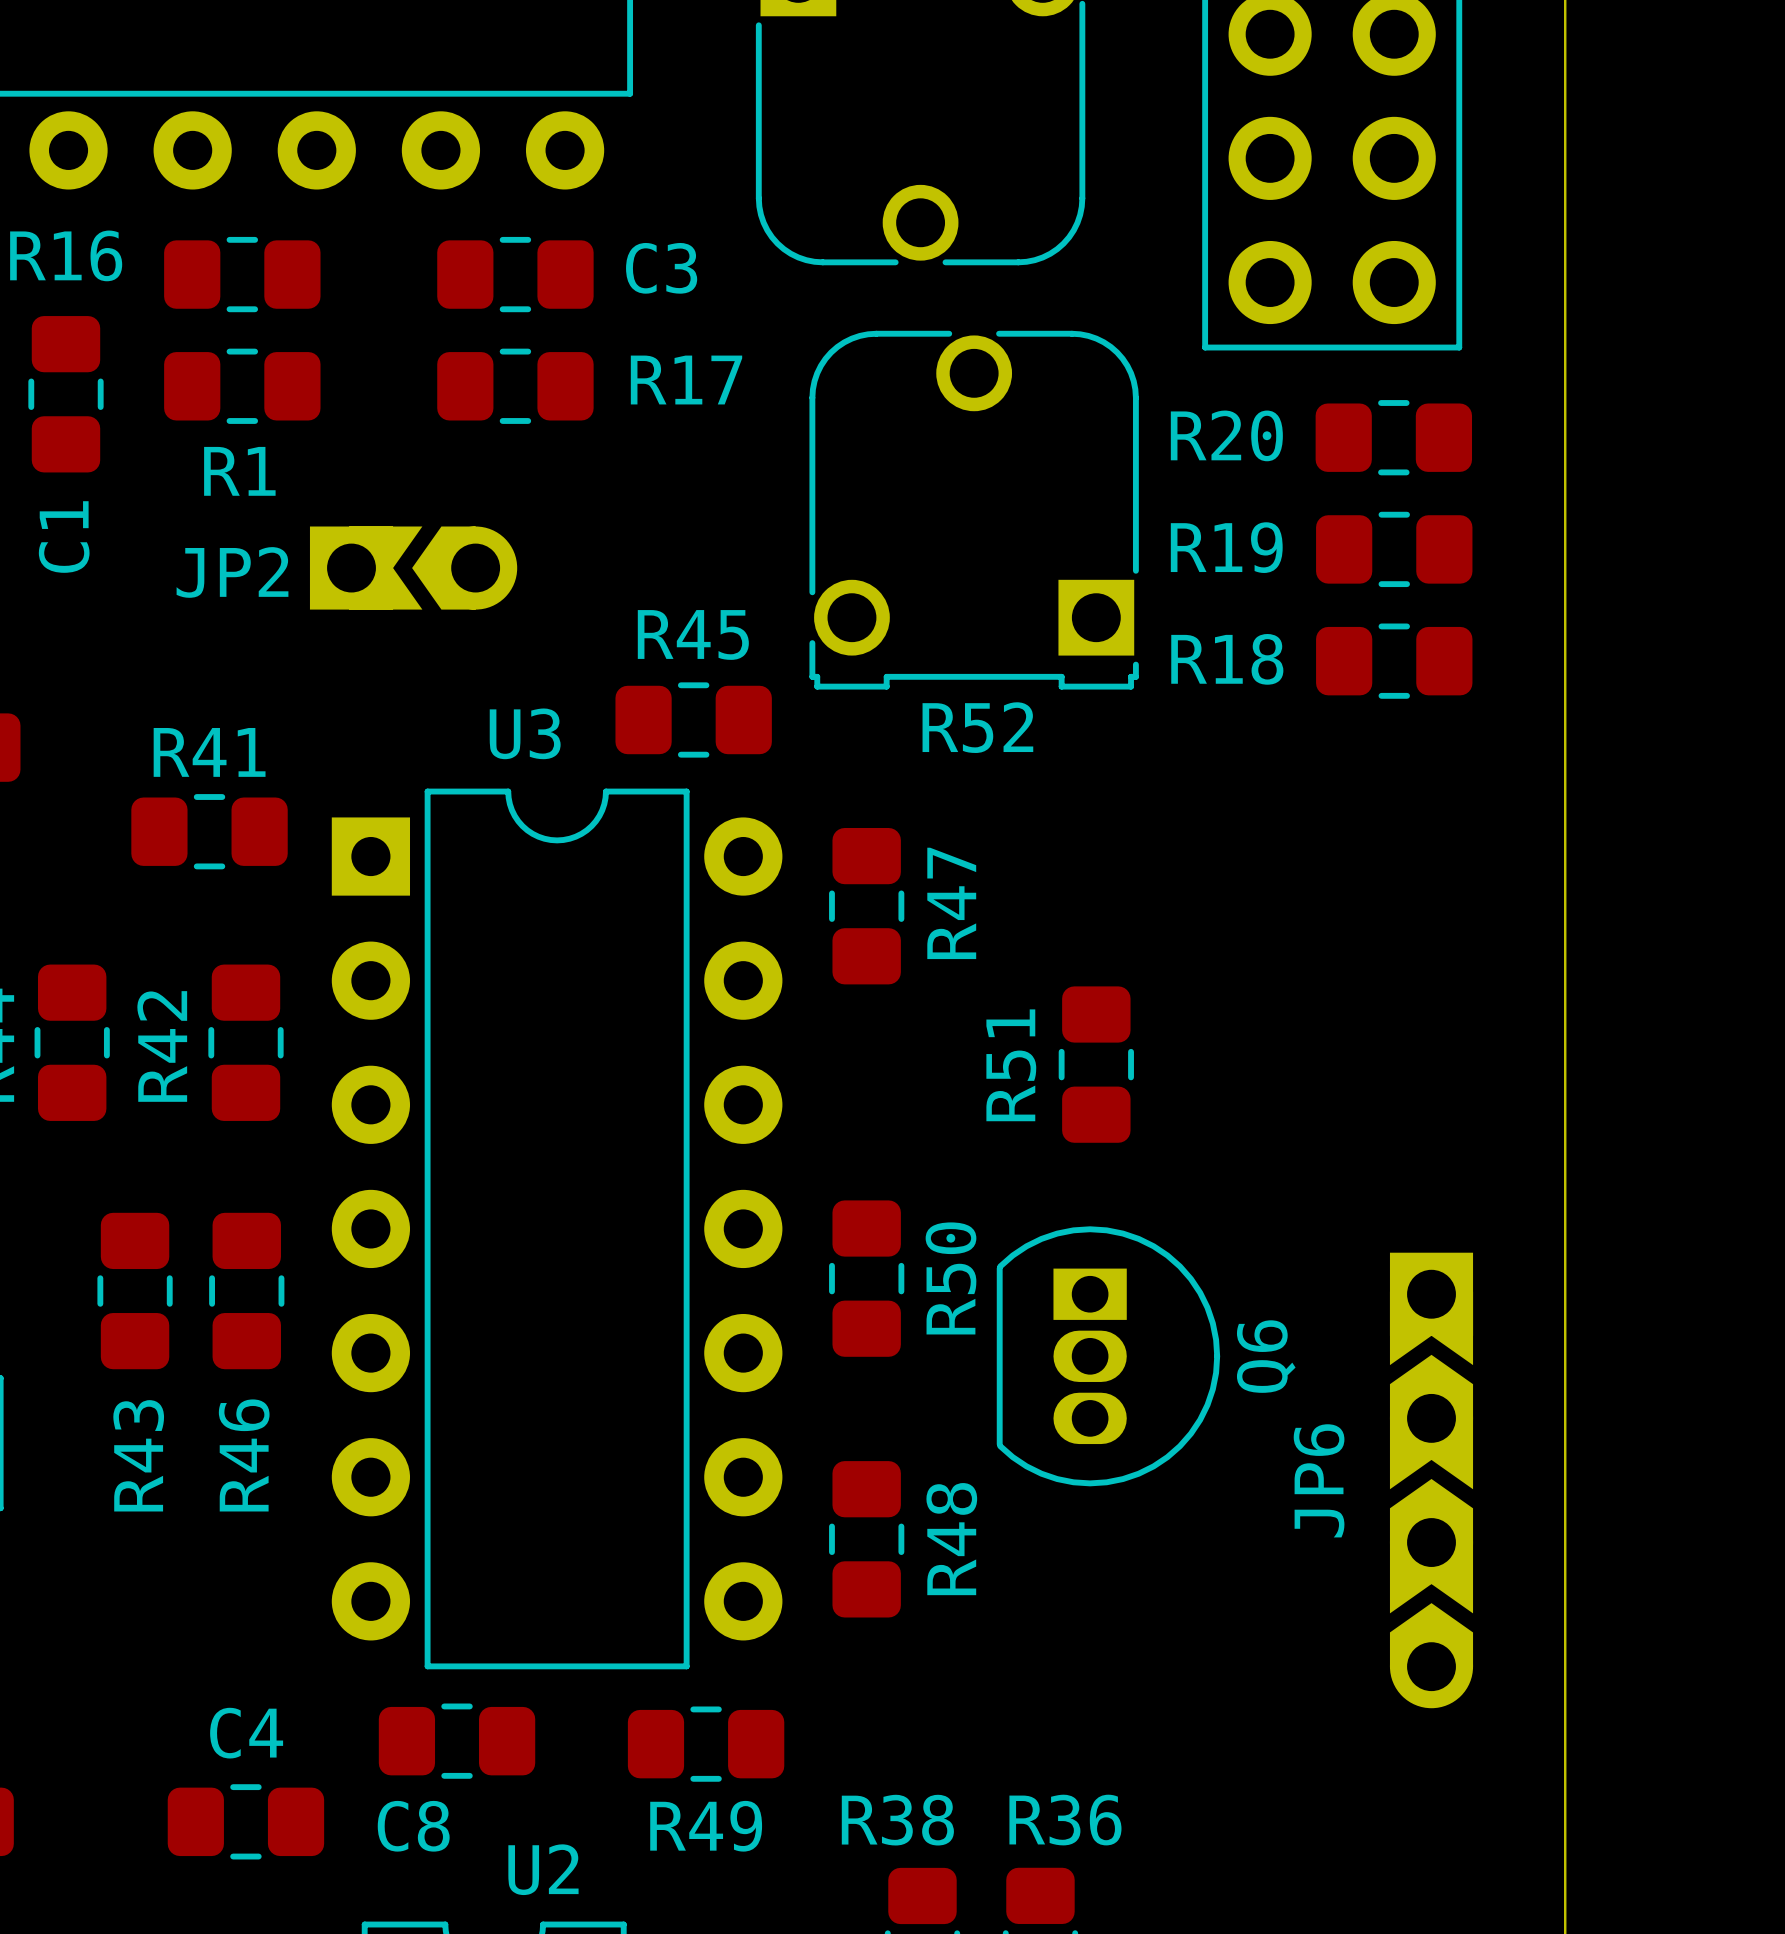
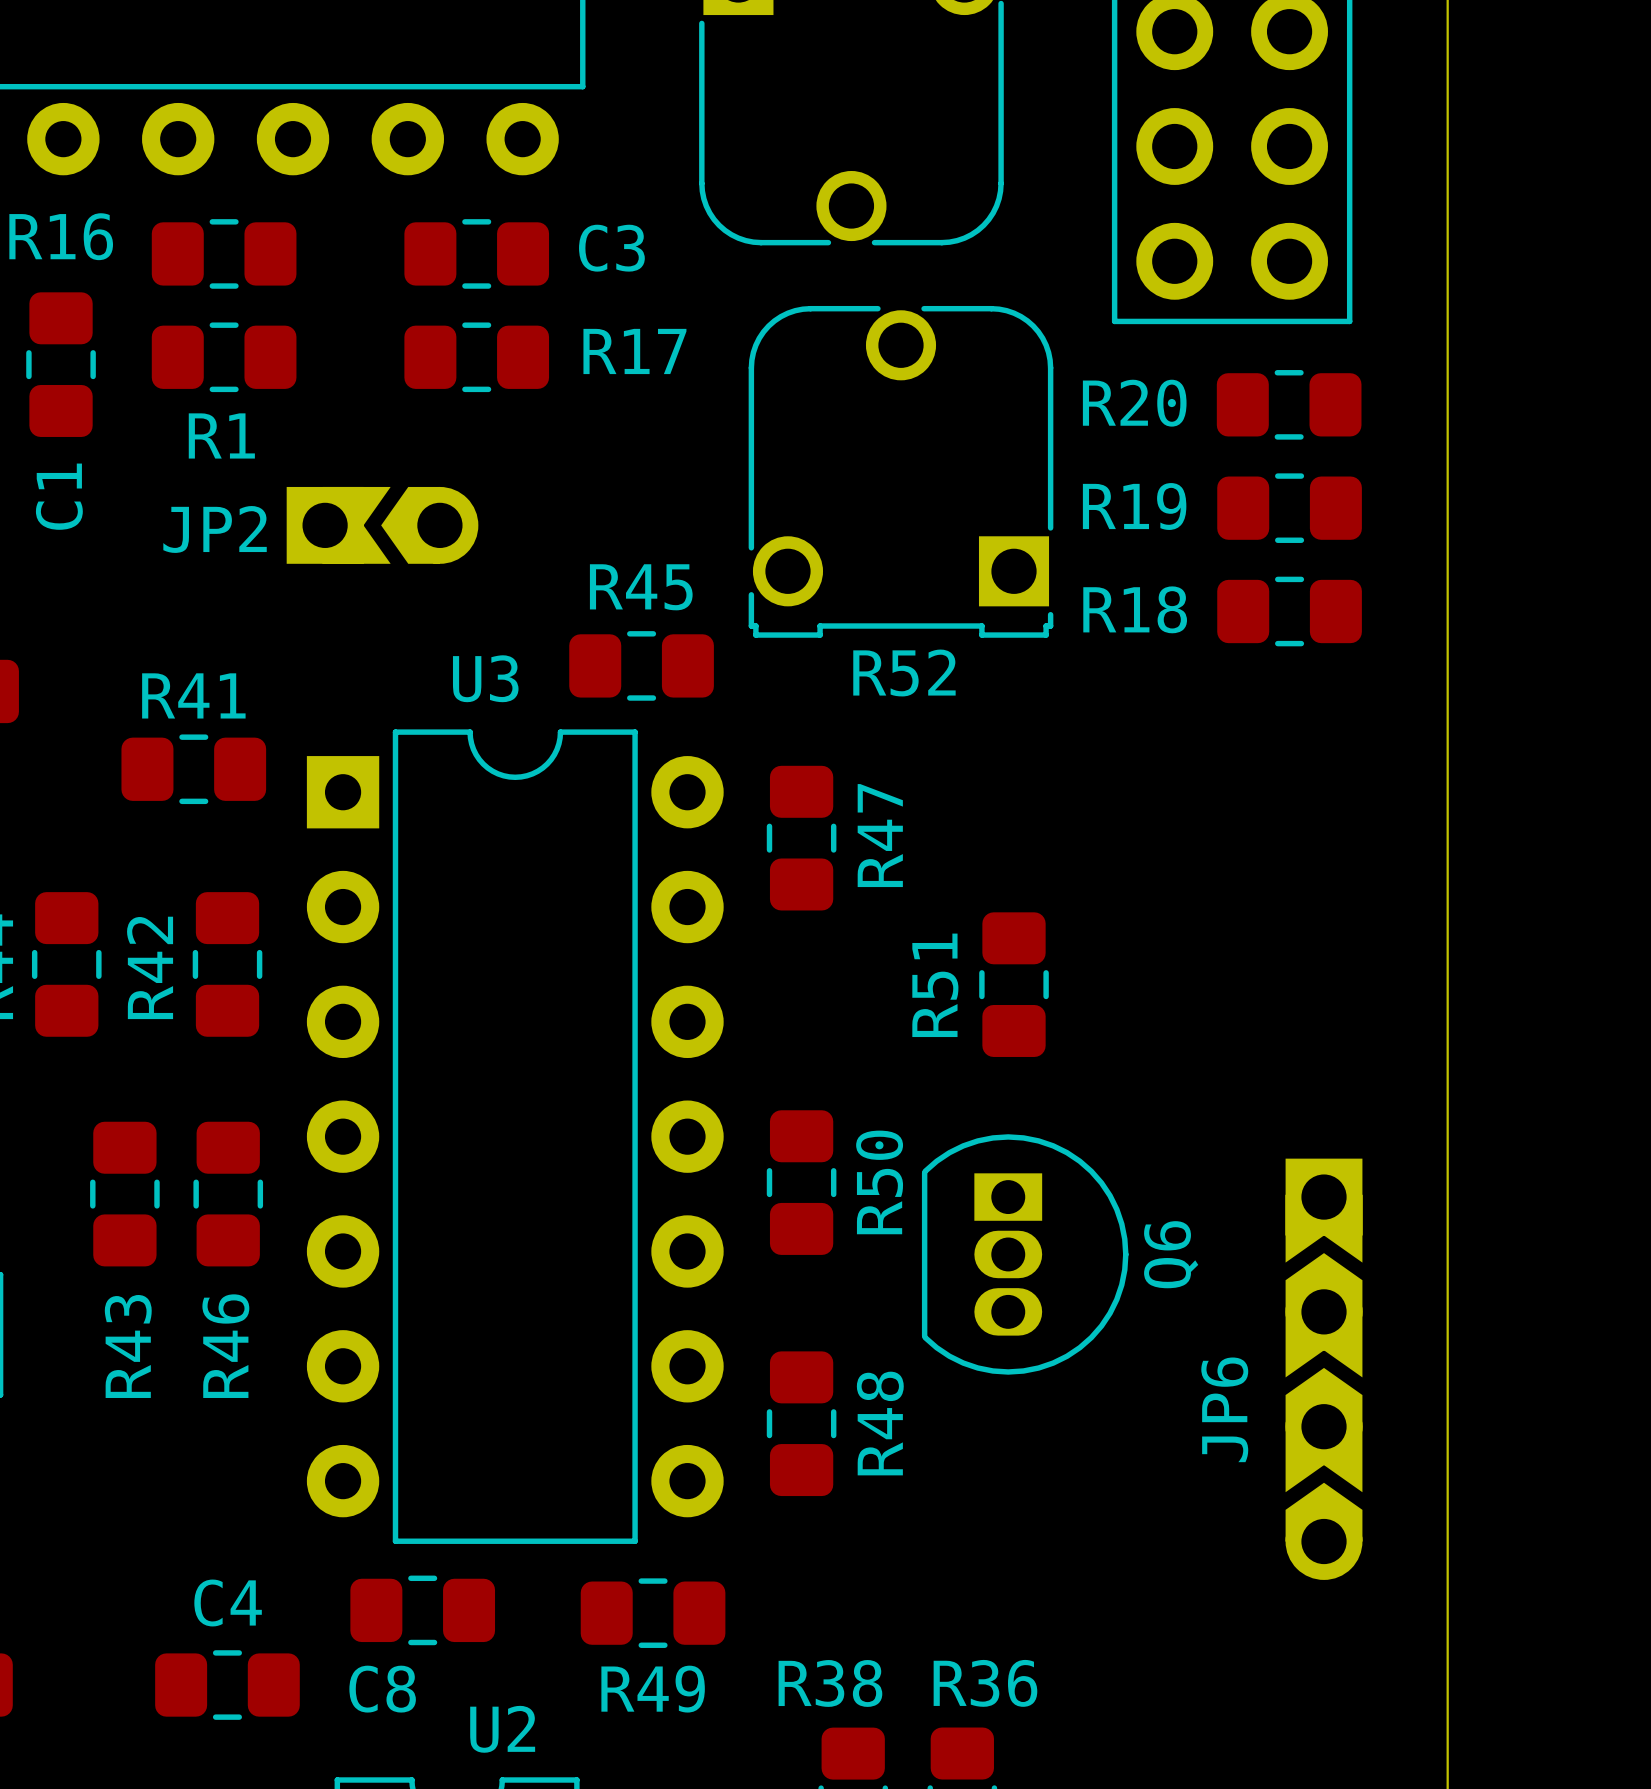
JP6 name position: JP6 (1319, 1480) -> JP6 (1224, 1409)

